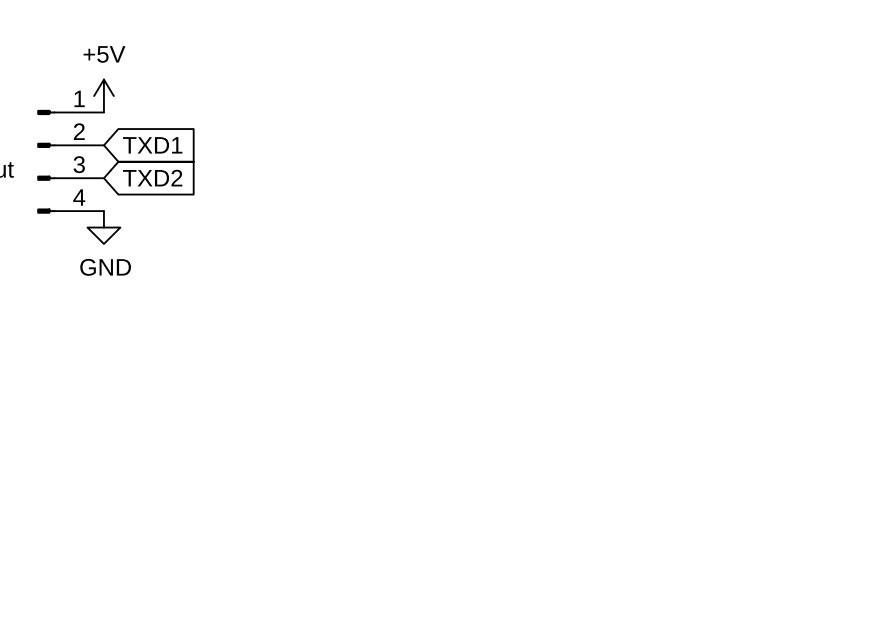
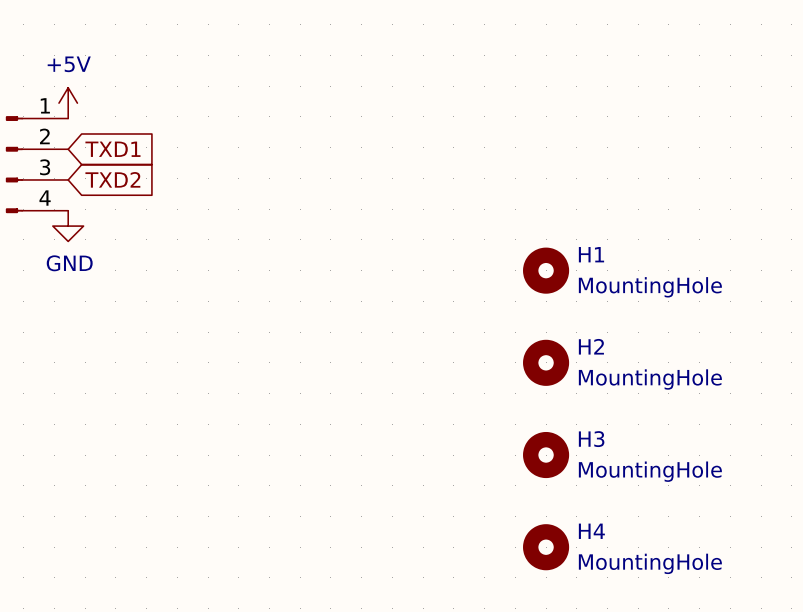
H1: none -> MountingHole (546, 270)
H2: none -> MountingHole (546, 362)
H3: none -> MountingHole (546, 455)
H4: none -> MountingHole (546, 547)

